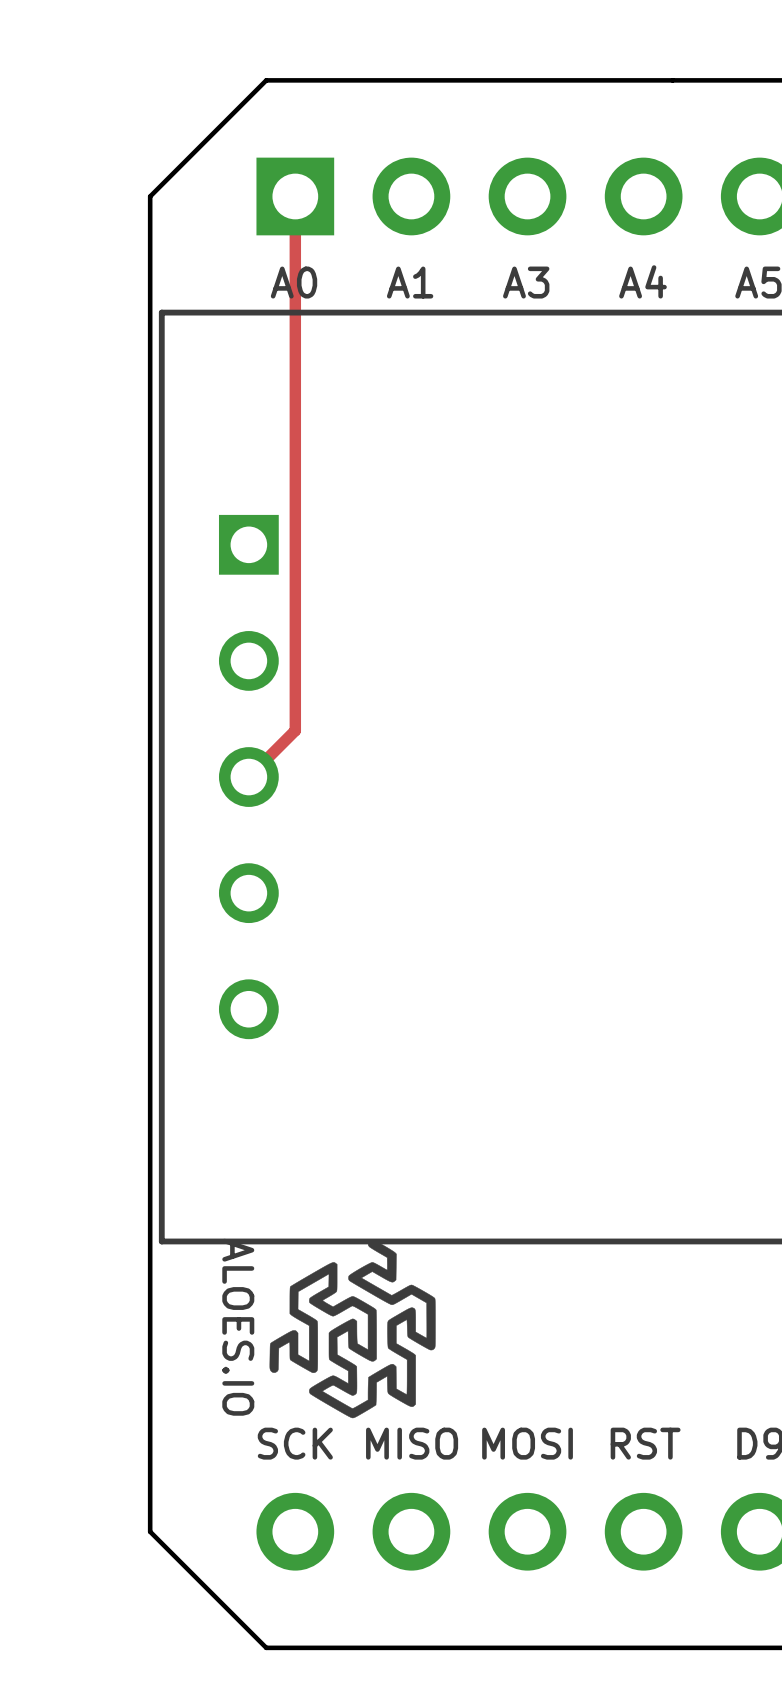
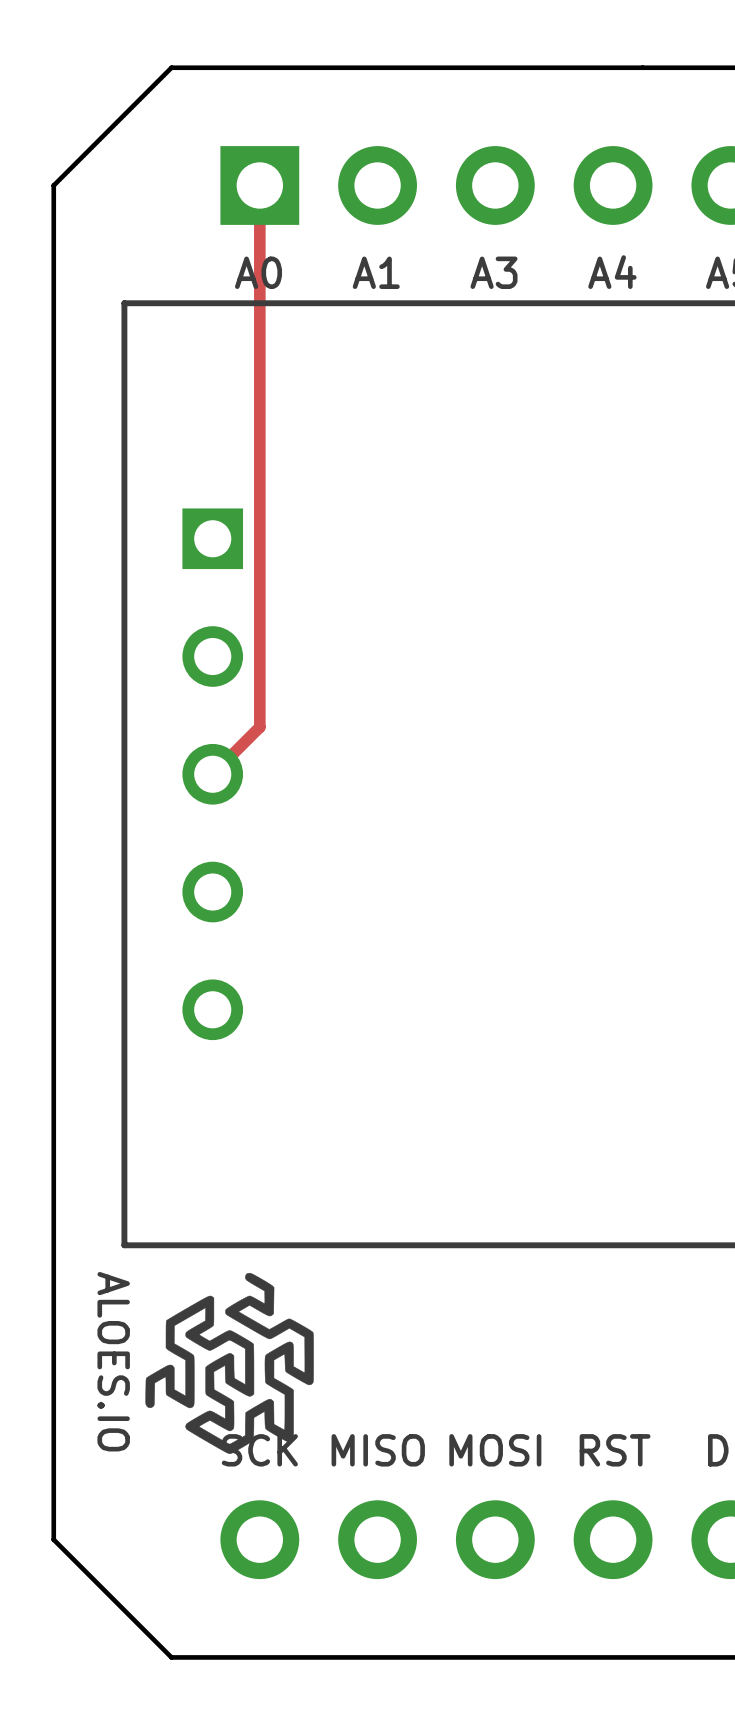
board edge: (266, 80) (150, 196) (150, 1531) (266, 1647) -> (230, 67) (171, 67) (53, 185) (53, 1539) (171, 1657) (230, 1657)
text position: ALOES.IO (238, 1327) -> ALOES.IO (113, 1361)
drawing position: (352, 1328) -> (229, 1363)

